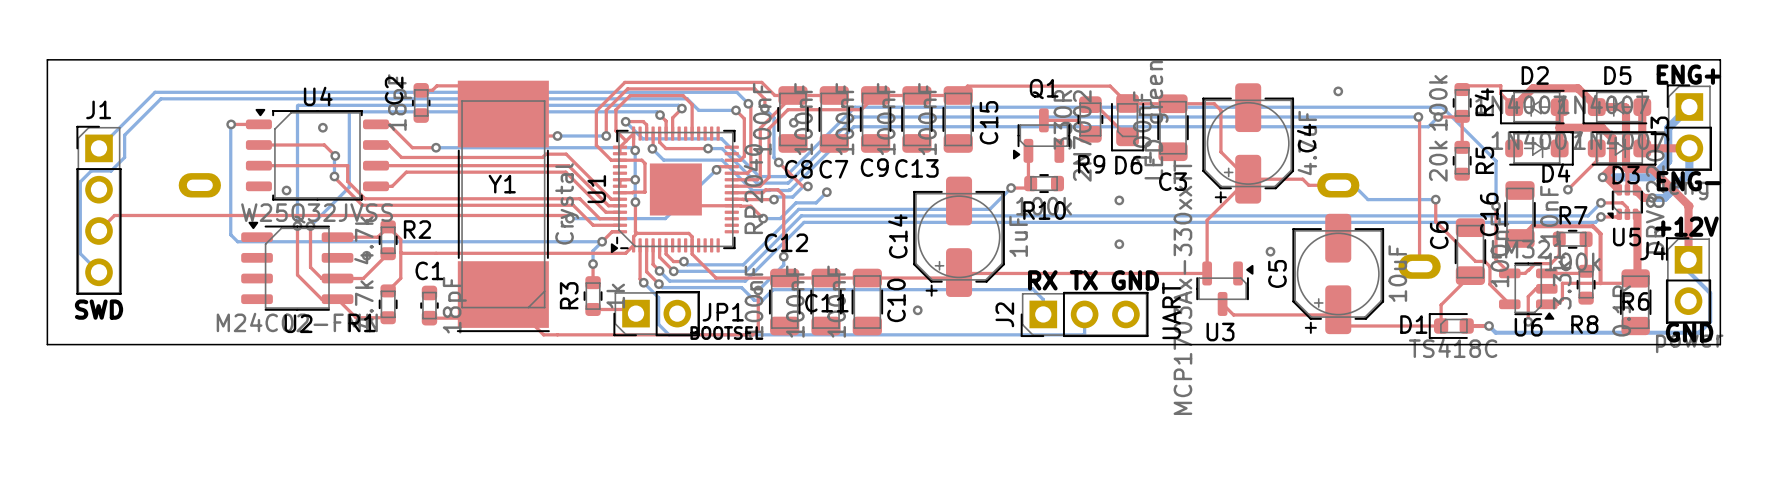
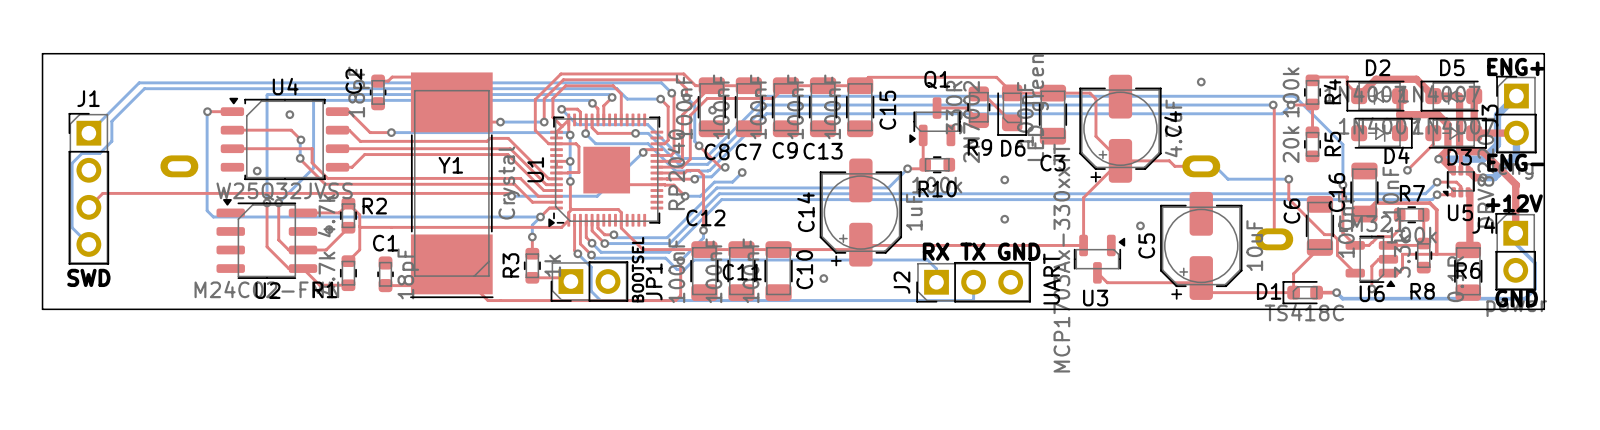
JP1 name rotation: 0° (723, 312) -> 90° counterclockwise (654, 281)
JP1 value rotation: 0° (726, 333) -> 90° counterclockwise (638, 269)

